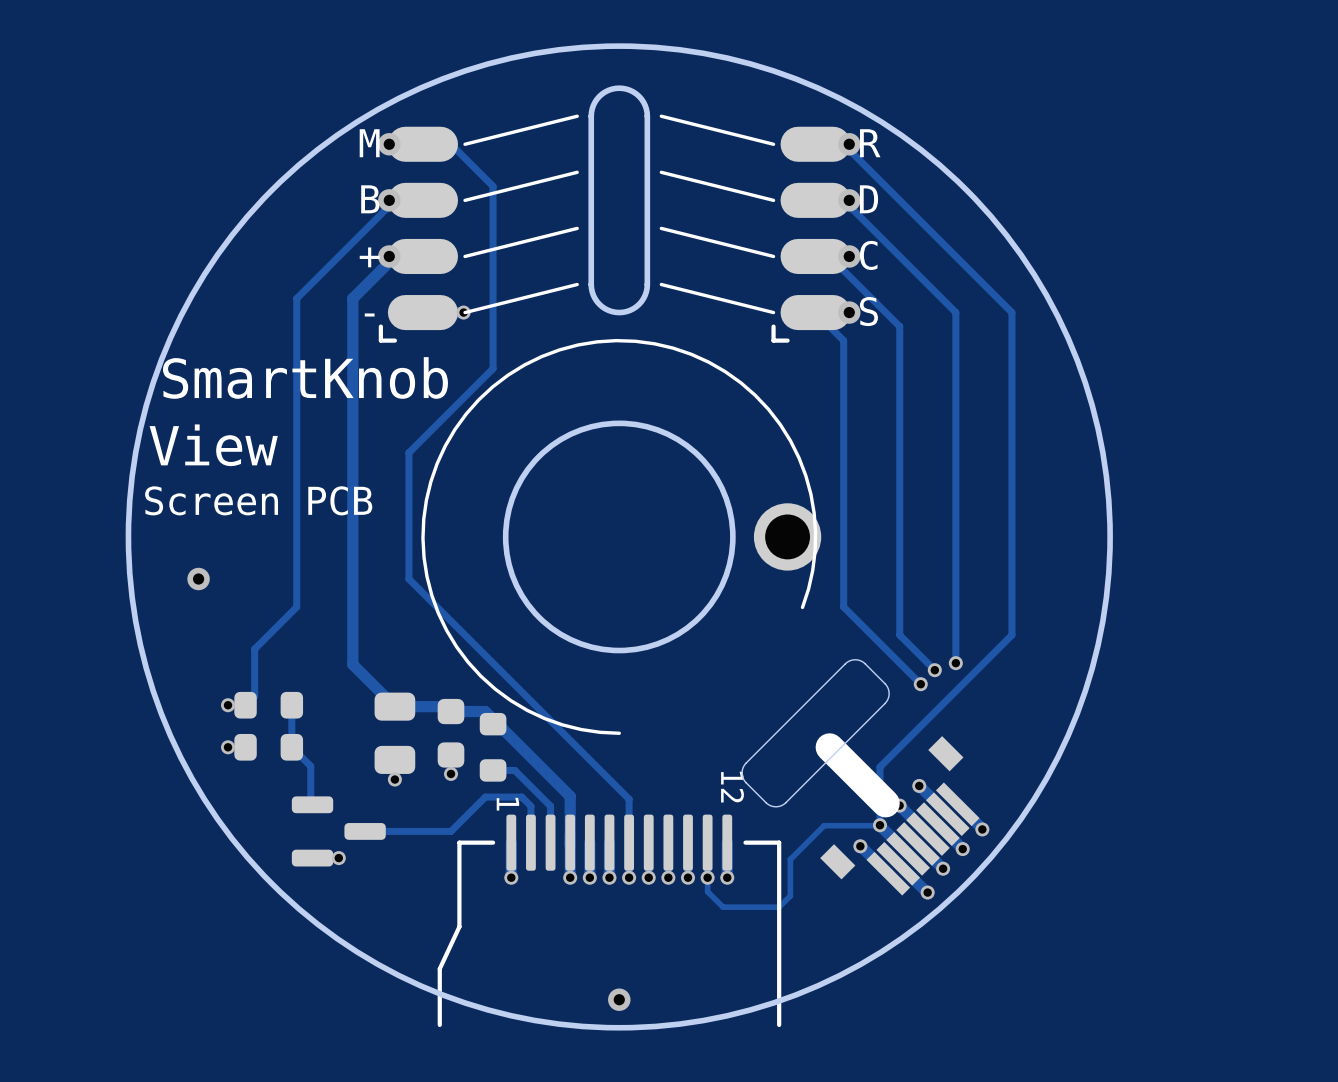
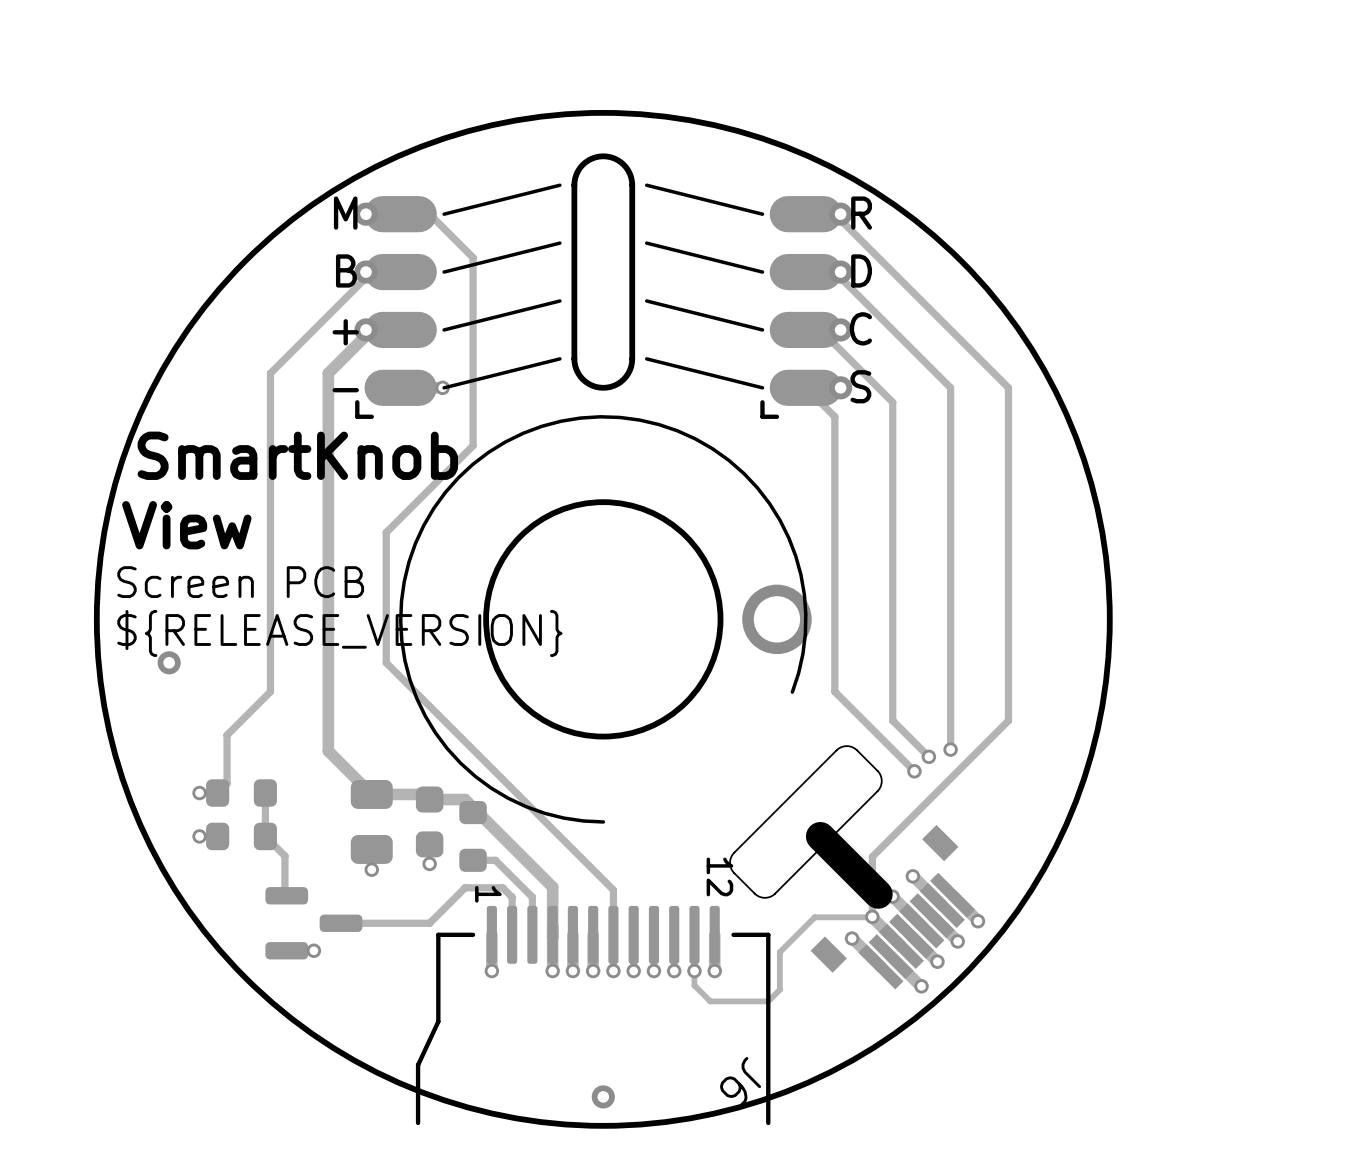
text: none -> ${RELEASE_VERSION} (339, 633)
J6 name: none -> J6 (740, 1081)

